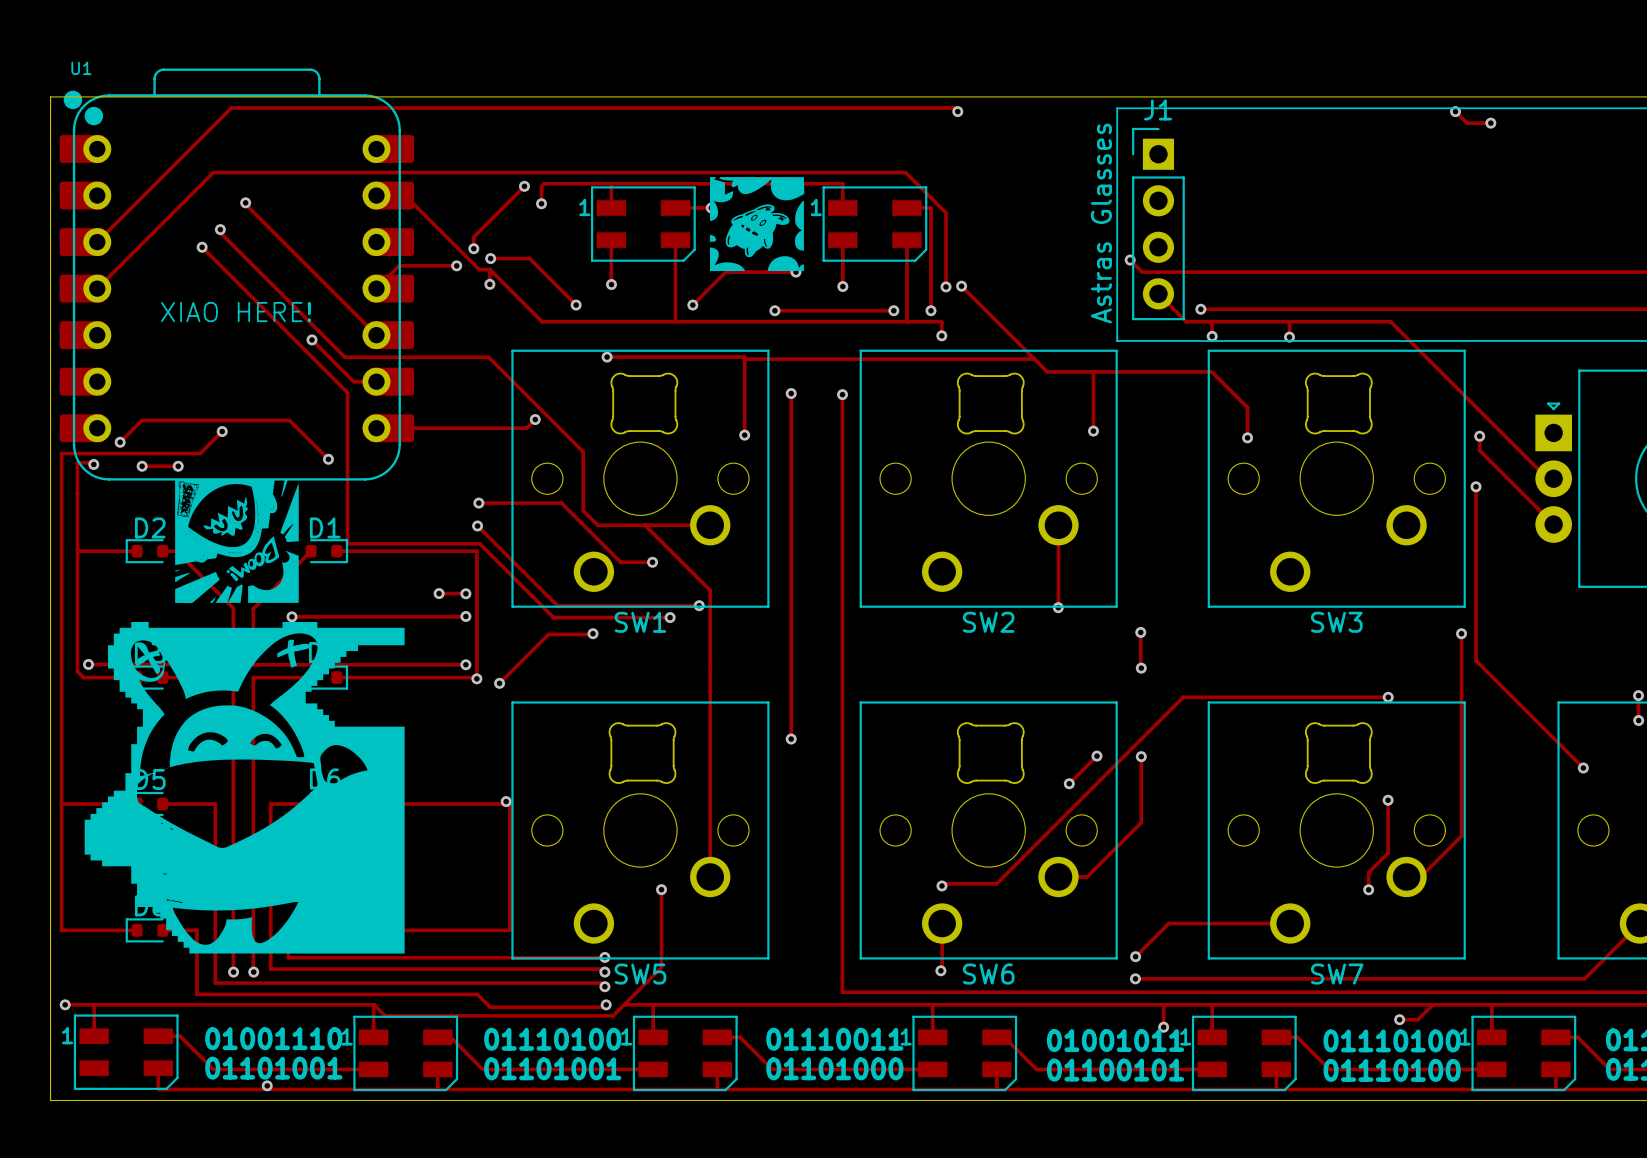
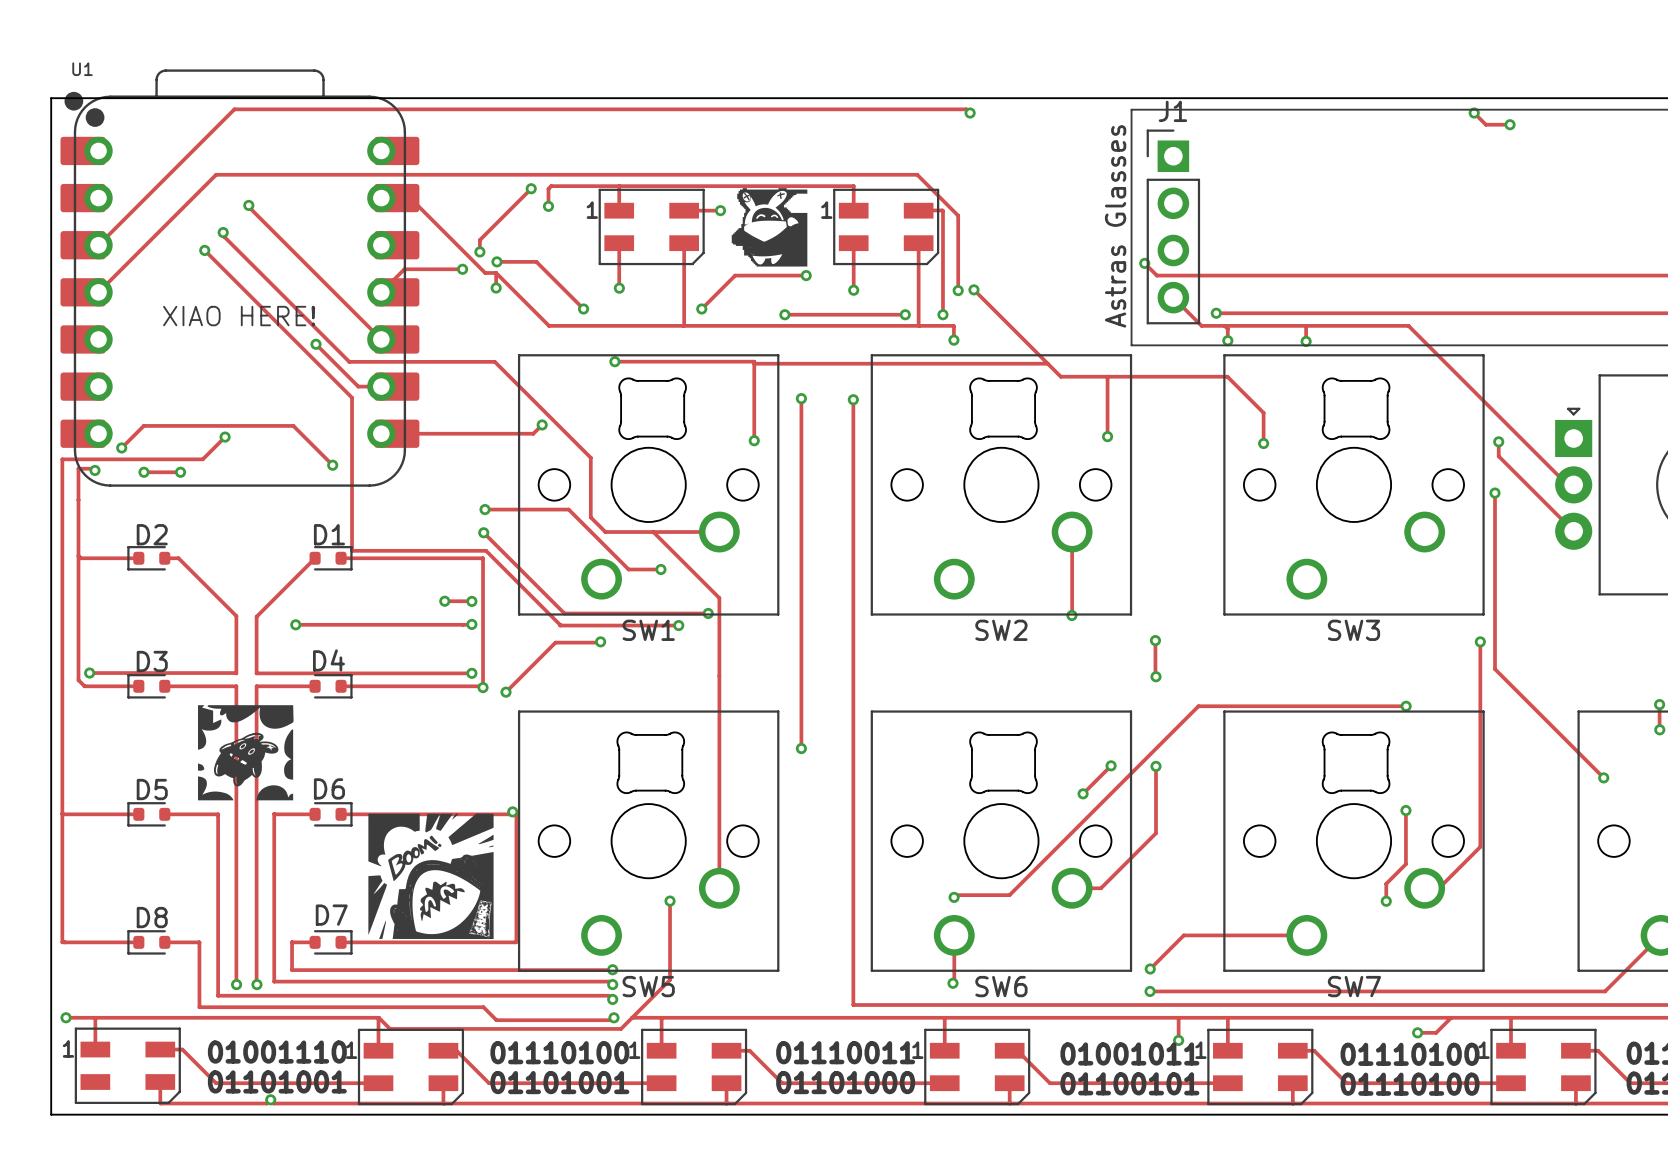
drawing: [710, 177, 804, 272] -> none
drawing shape: [719, 177, 805, 201] -> [777, 192, 785, 200]
drawing: none -> [731, 188, 808, 267]
drawing: [84, 479, 405, 954] -> none
drawing position: (228, 571) -> (439, 845)
drawing: none -> [198, 705, 294, 801]
drawing: none -> [368, 813, 494, 940]

